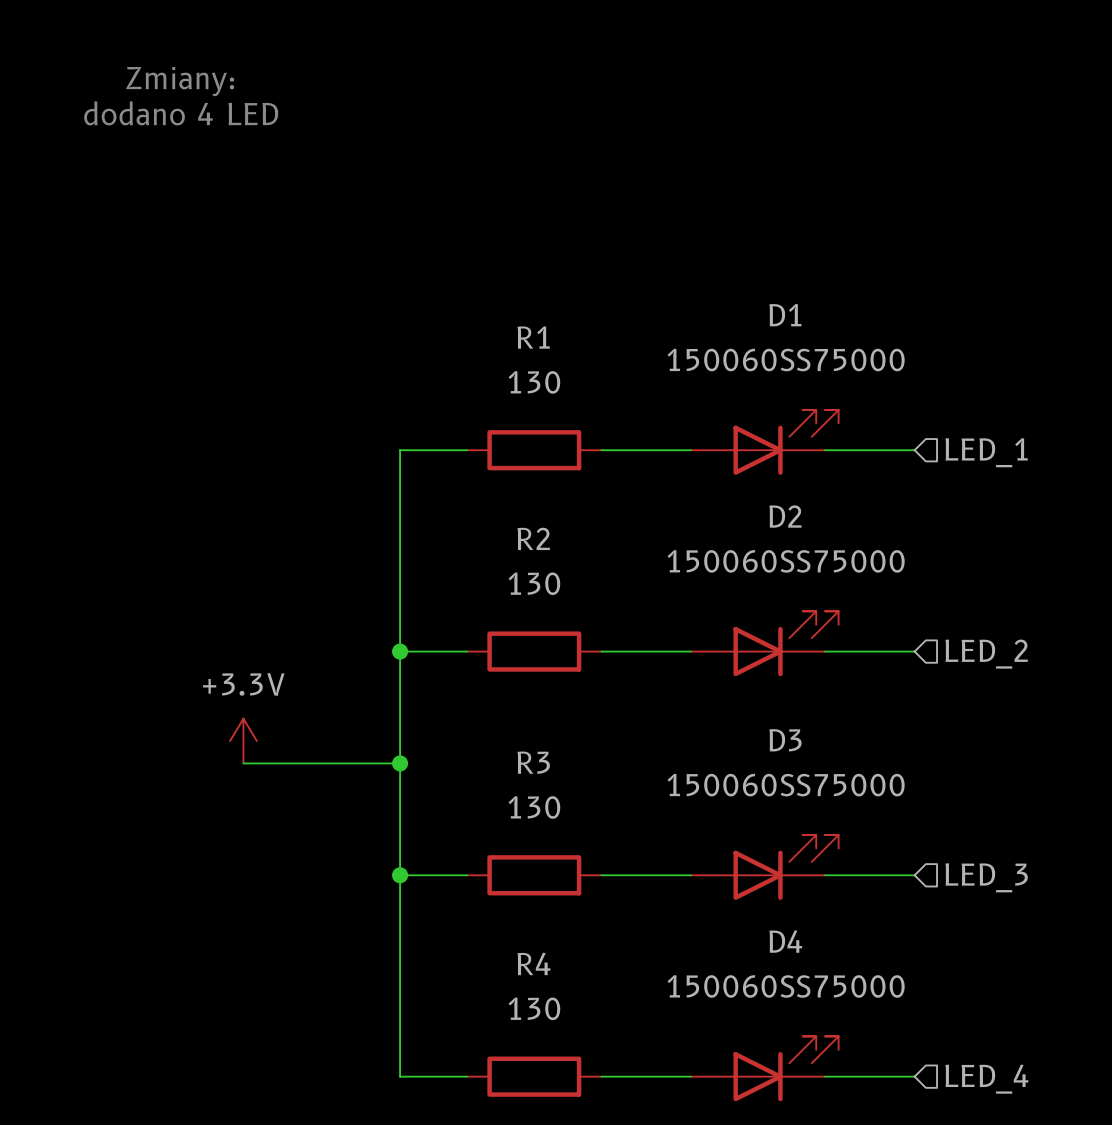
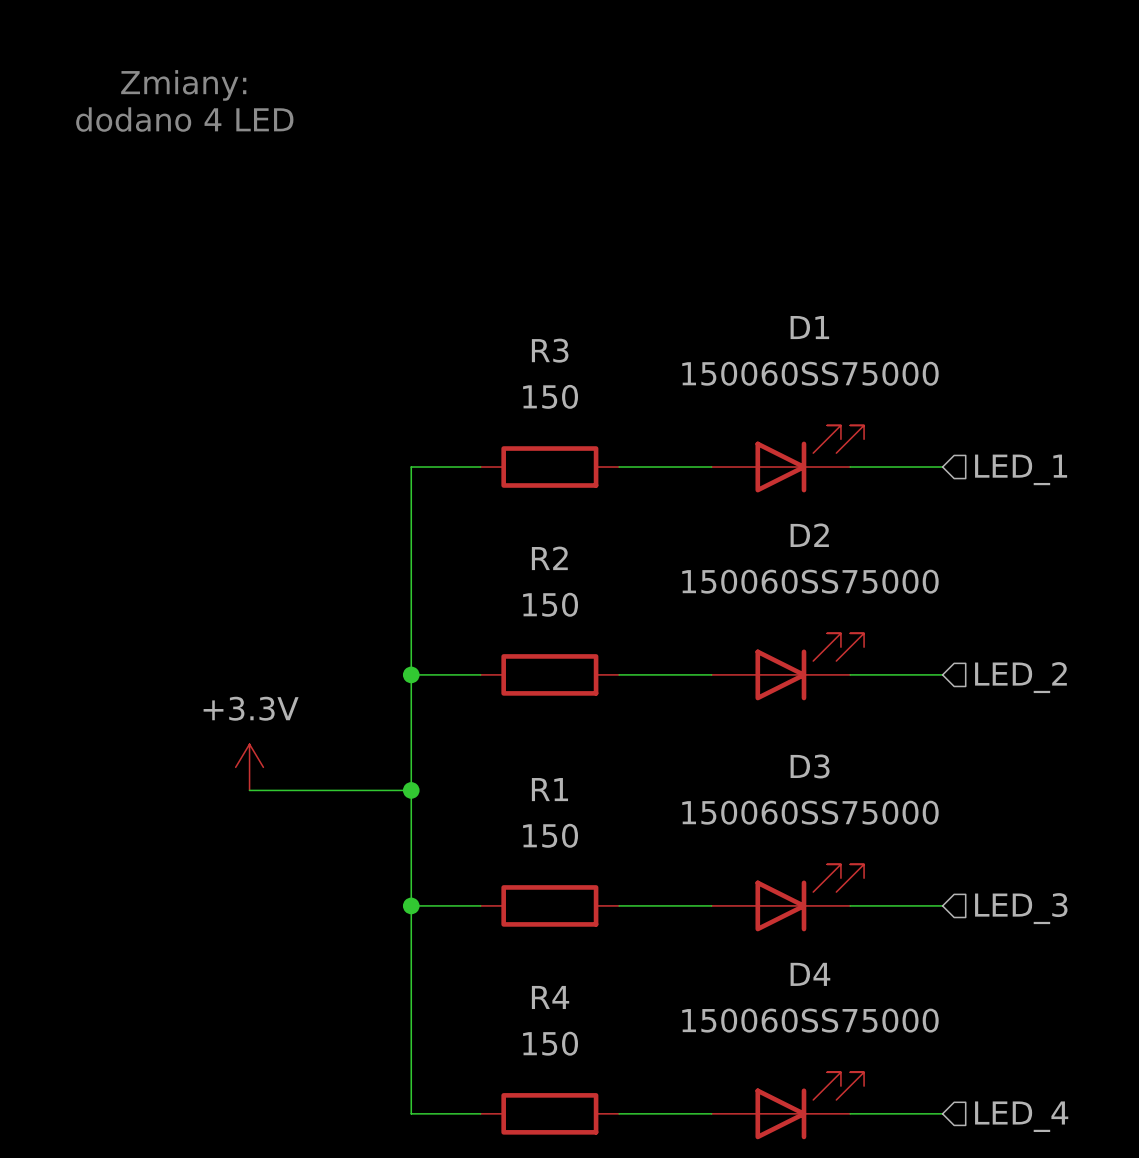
R1 name: R1 (533, 337) -> R3 (550, 350)
R1 value: 130 (534, 382) -> 150 (550, 396)
R2 value: 130 (534, 583) -> 150 (550, 604)
R3 name: R3 (533, 762) -> R1 (549, 789)
R3 value: 130 (534, 807) -> 150 (550, 835)
R4 value: 130 (534, 1008) -> 150 (550, 1043)

